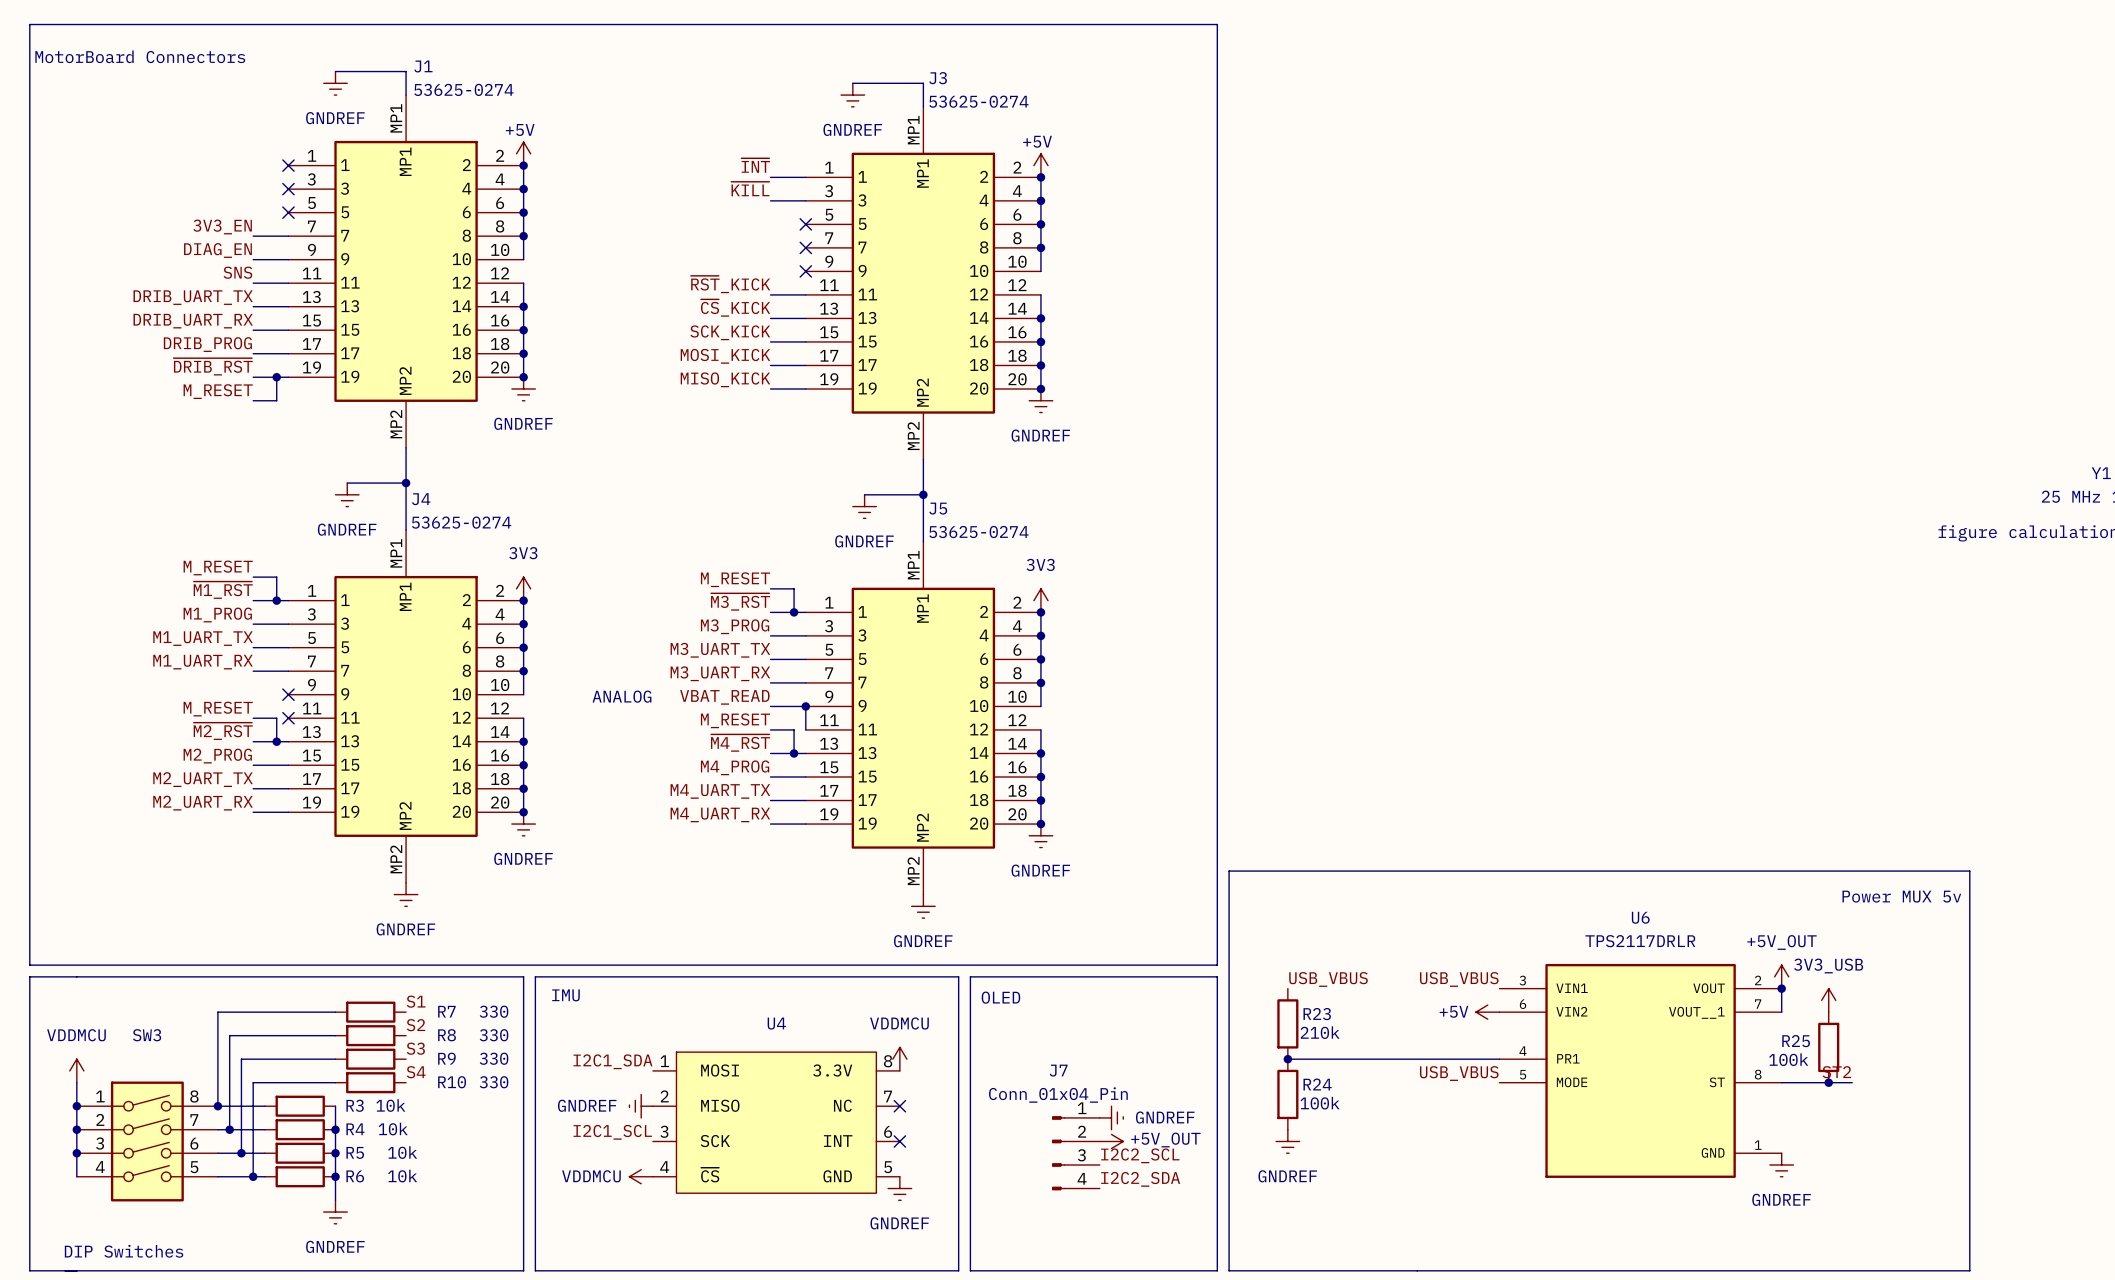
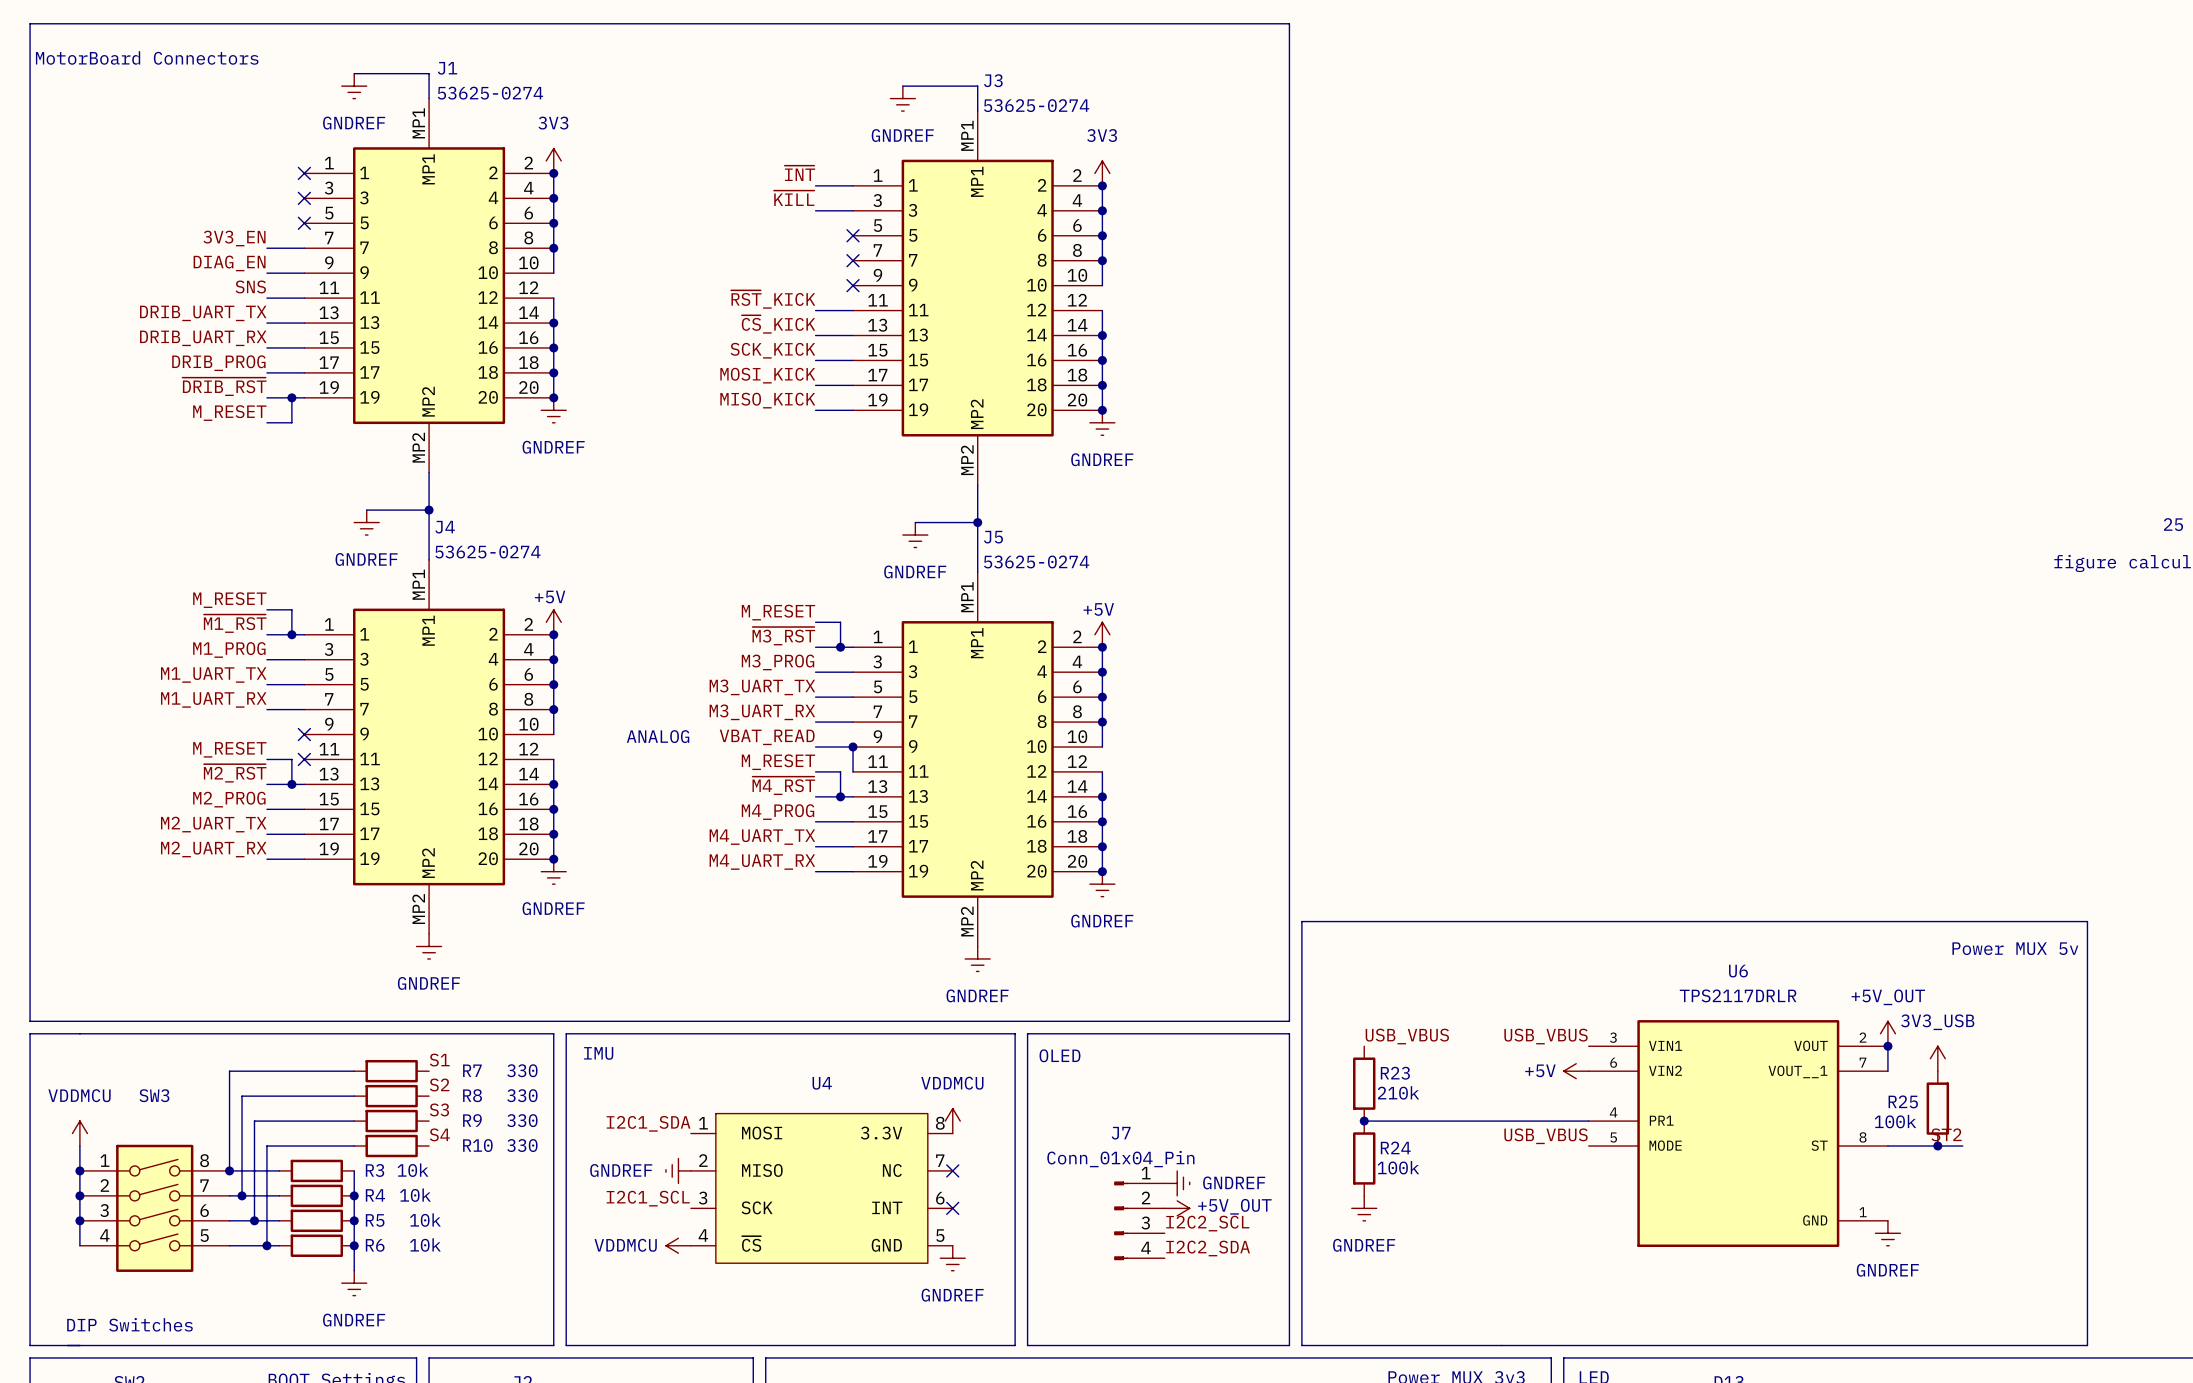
power symbol: +5V (523, 153) -> 3V3 (553, 160)
power symbol: +5V (1040, 165) -> 3V3 (1102, 173)
power symbol: 3V3 (523, 588) -> +5V (553, 622)
power symbol: 3V3 (1040, 600) -> +5V (1102, 634)

